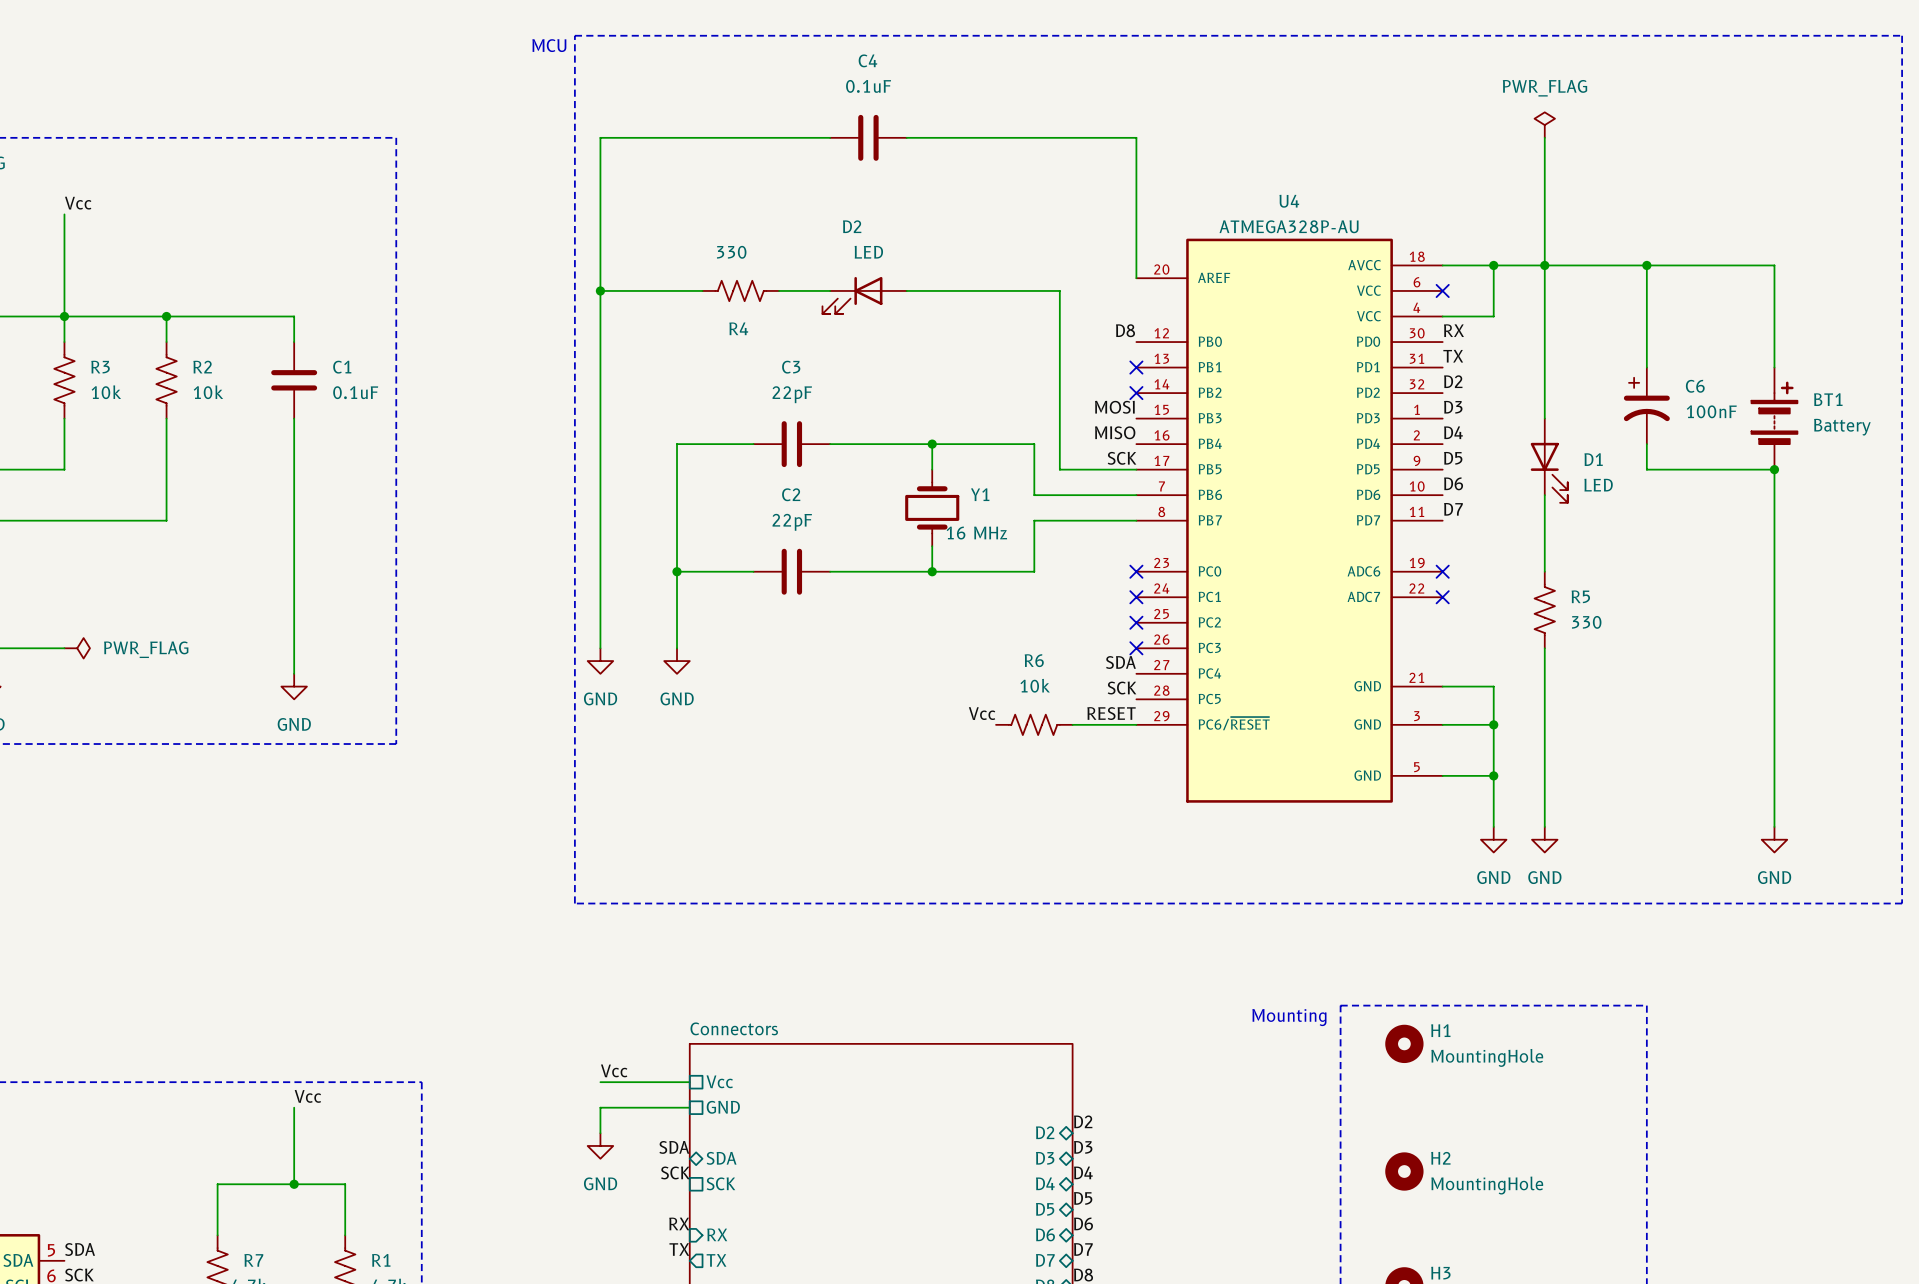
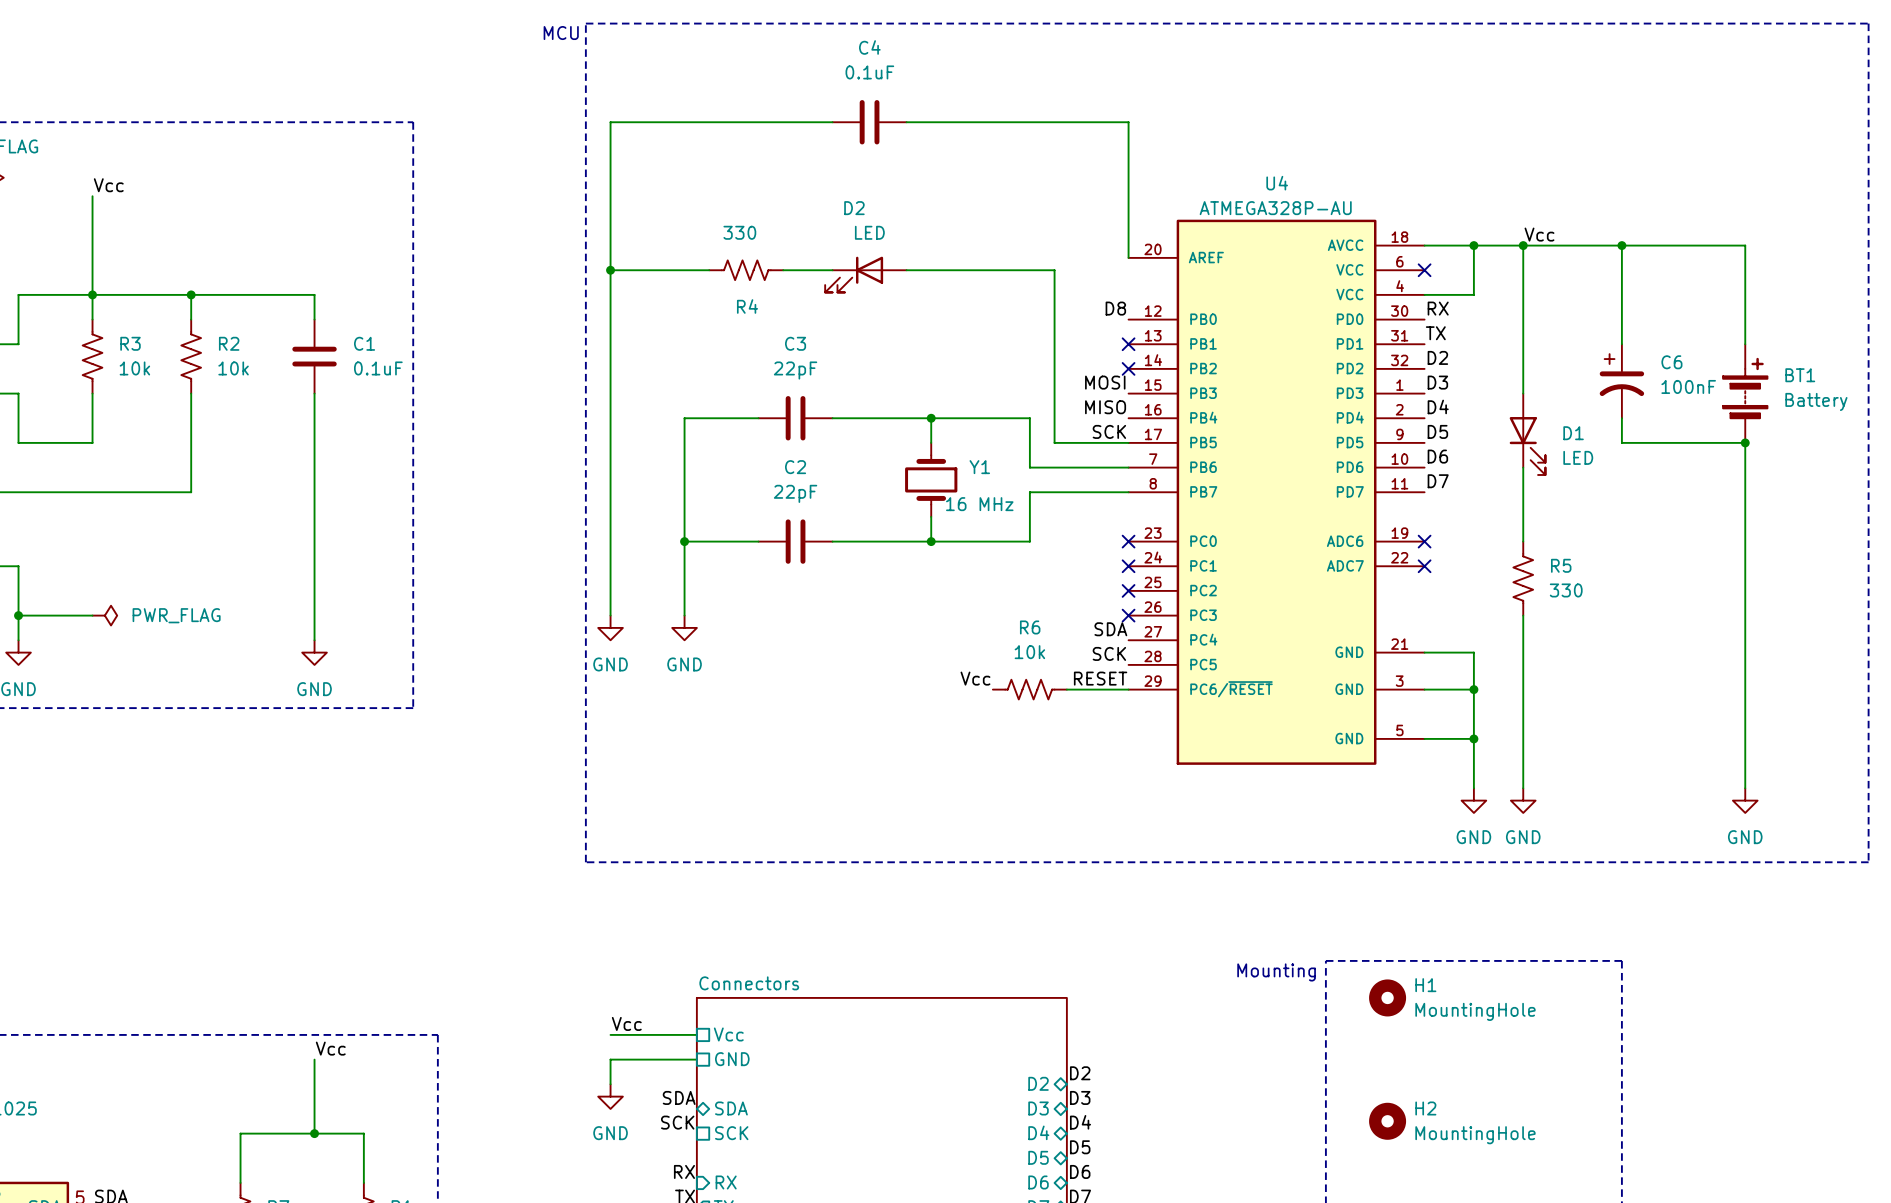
power symbol: PWR_FLAG (1544, 125) -> none
wire: (1544, 137) (1544, 265) -> none
label: none -> Vcc (1539, 234)

